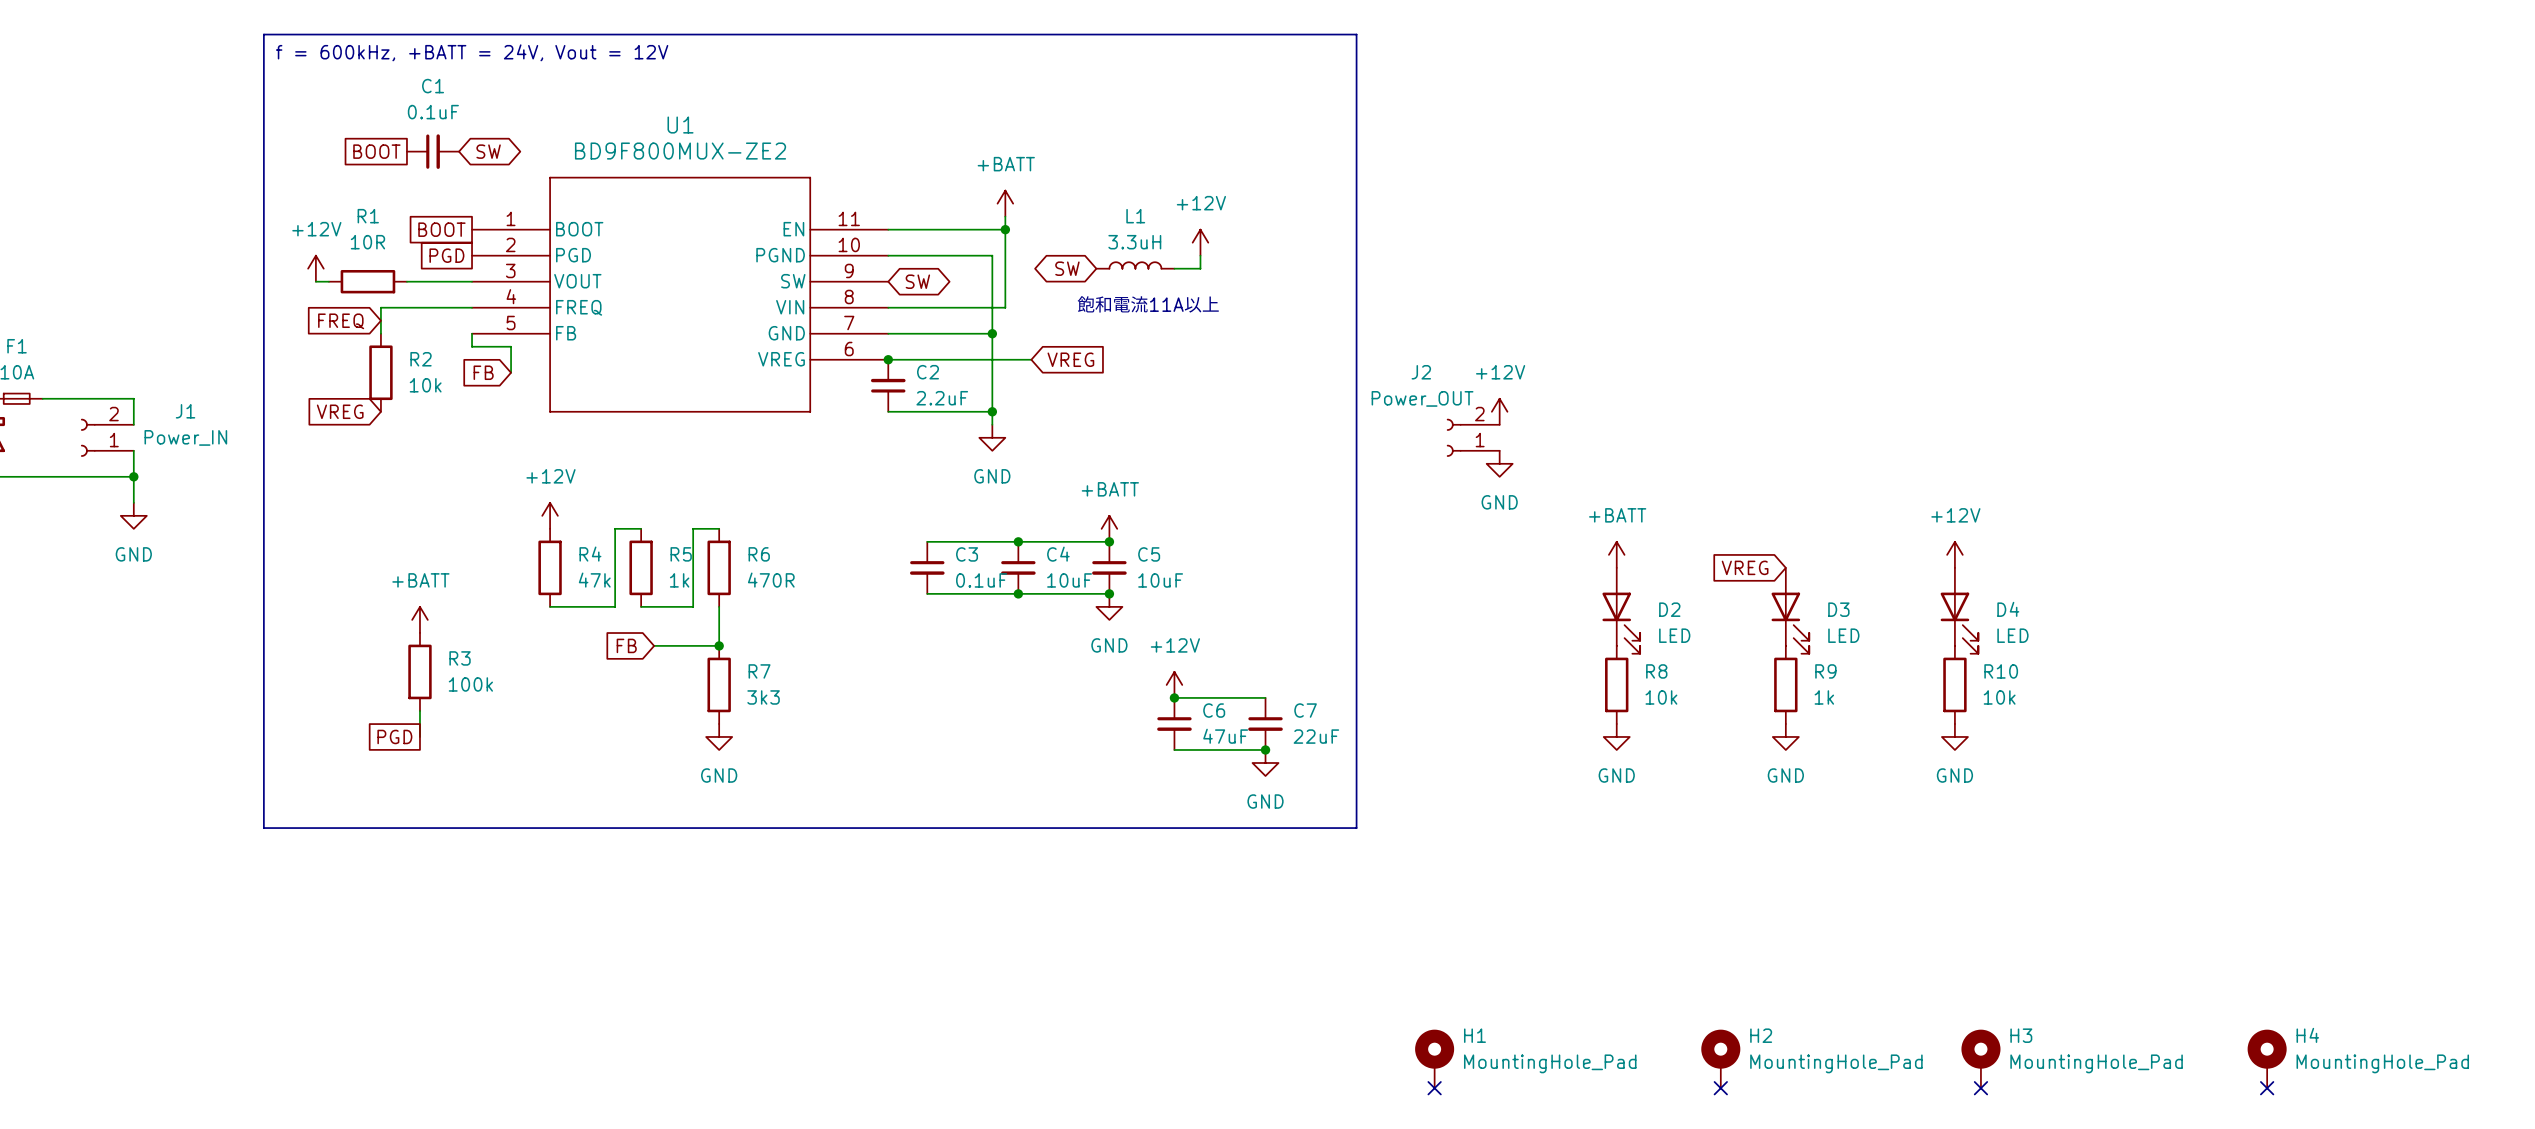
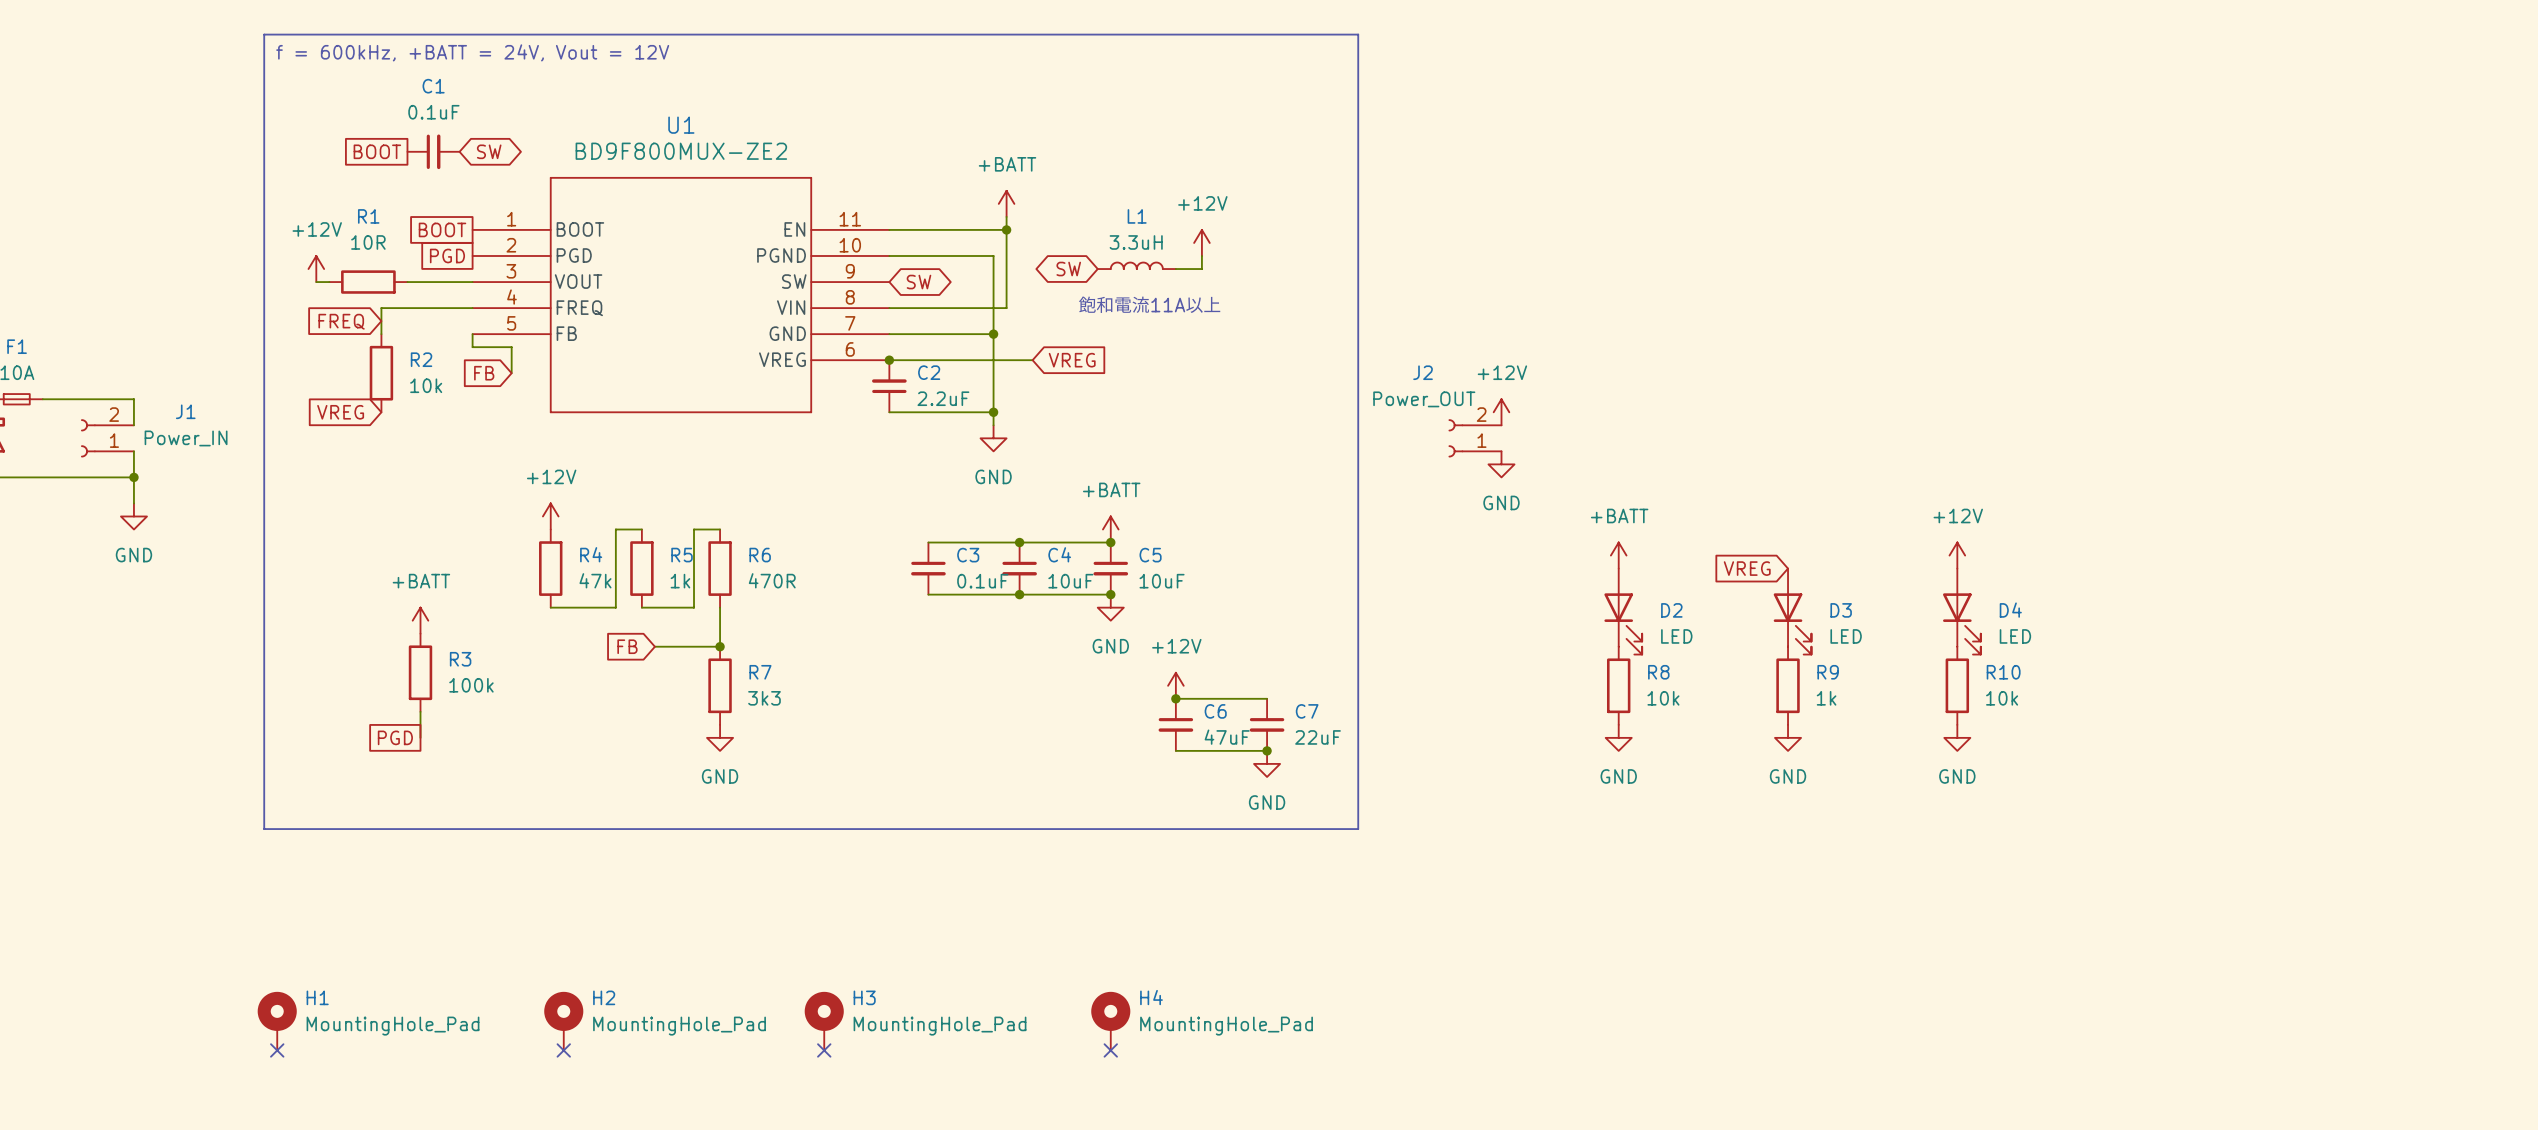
no-connect mark: none -> (277, 1050)
no-connect mark: none -> (563, 1050)
no-connect mark: none -> (824, 1050)
no-connect mark: none -> (1110, 1050)
H1 position: (1434, 1058) -> (277, 1021)
H2 position: (1720, 1058) -> (563, 1021)
H3 position: (1980, 1058) -> (824, 1021)
H4 position: (2267, 1058) -> (1110, 1021)
no-connect mark: (1434, 1088) -> none
no-connect mark: (1720, 1088) -> none
no-connect mark: (1980, 1088) -> none
no-connect mark: (2267, 1088) -> none

